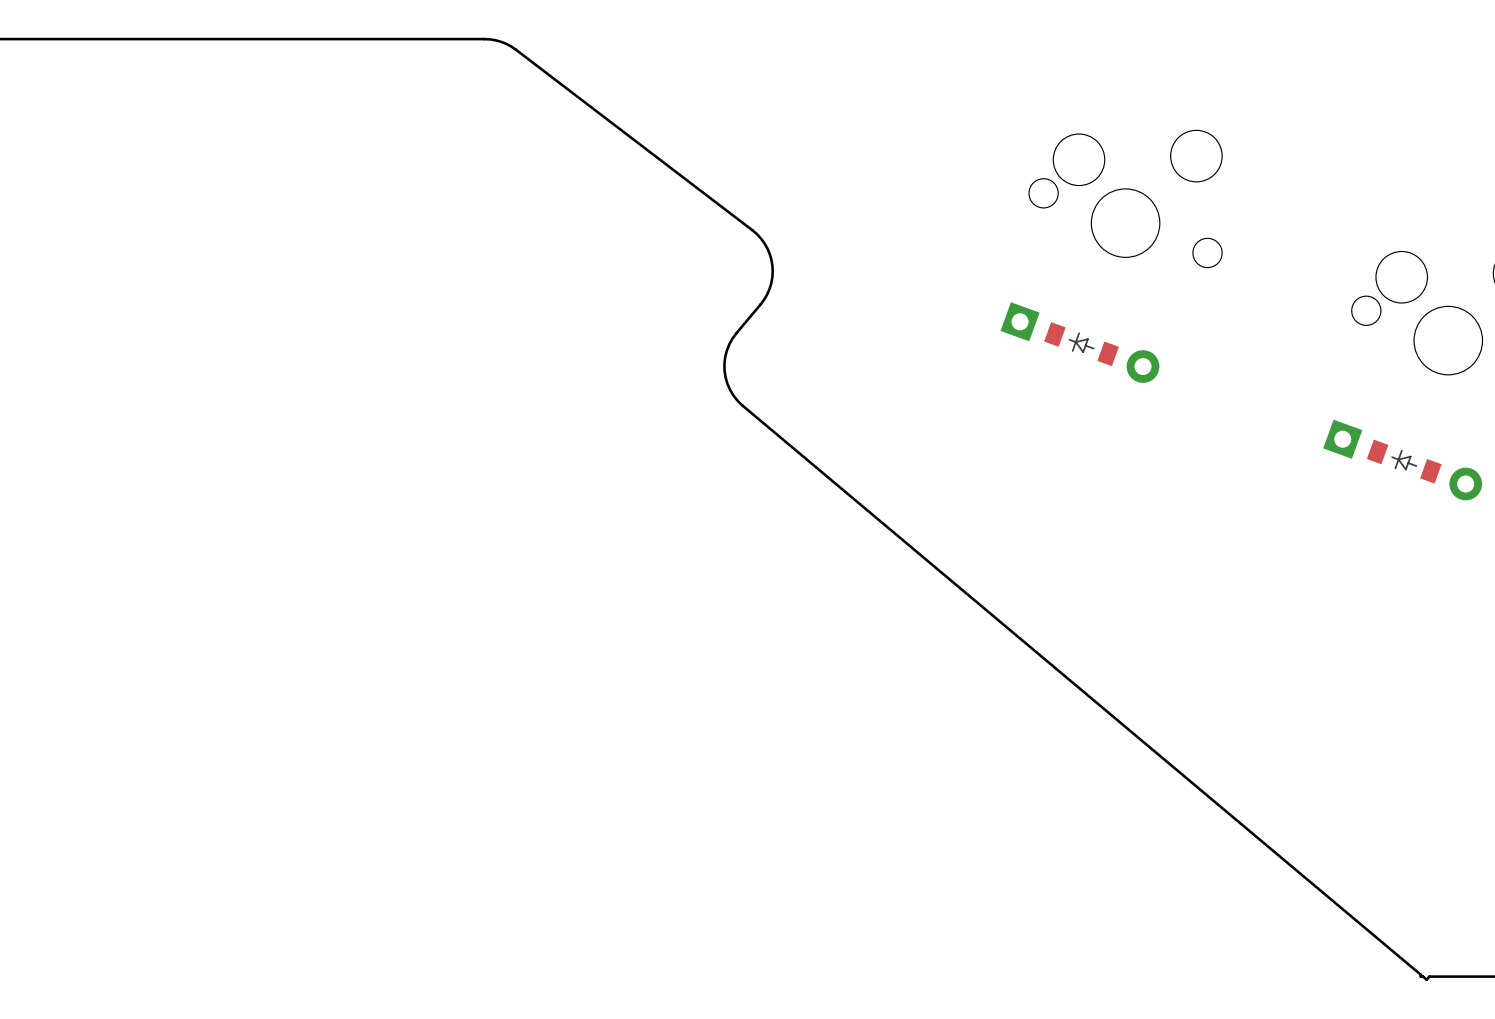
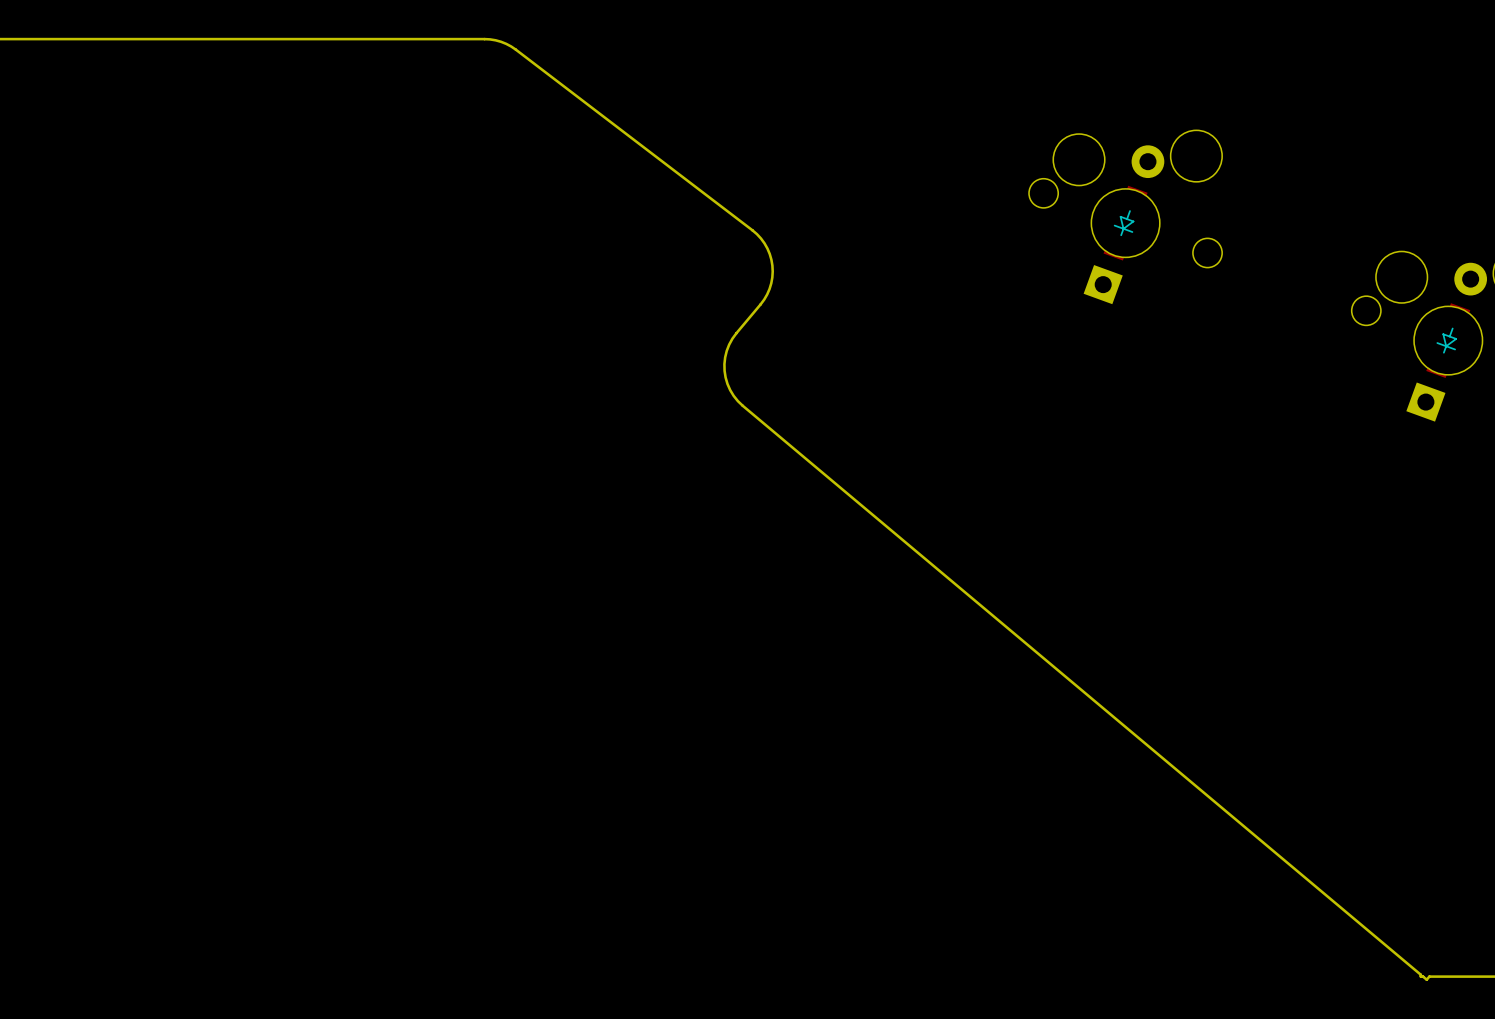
part rotation: 0° (1079, 342) -> 90° counterclockwise (1123, 224)
part position: (1079, 342) -> (1123, 224)
part rotation: 0° (1402, 460) -> 90° counterclockwise (1446, 342)
part position: (1402, 460) -> (1446, 342)

